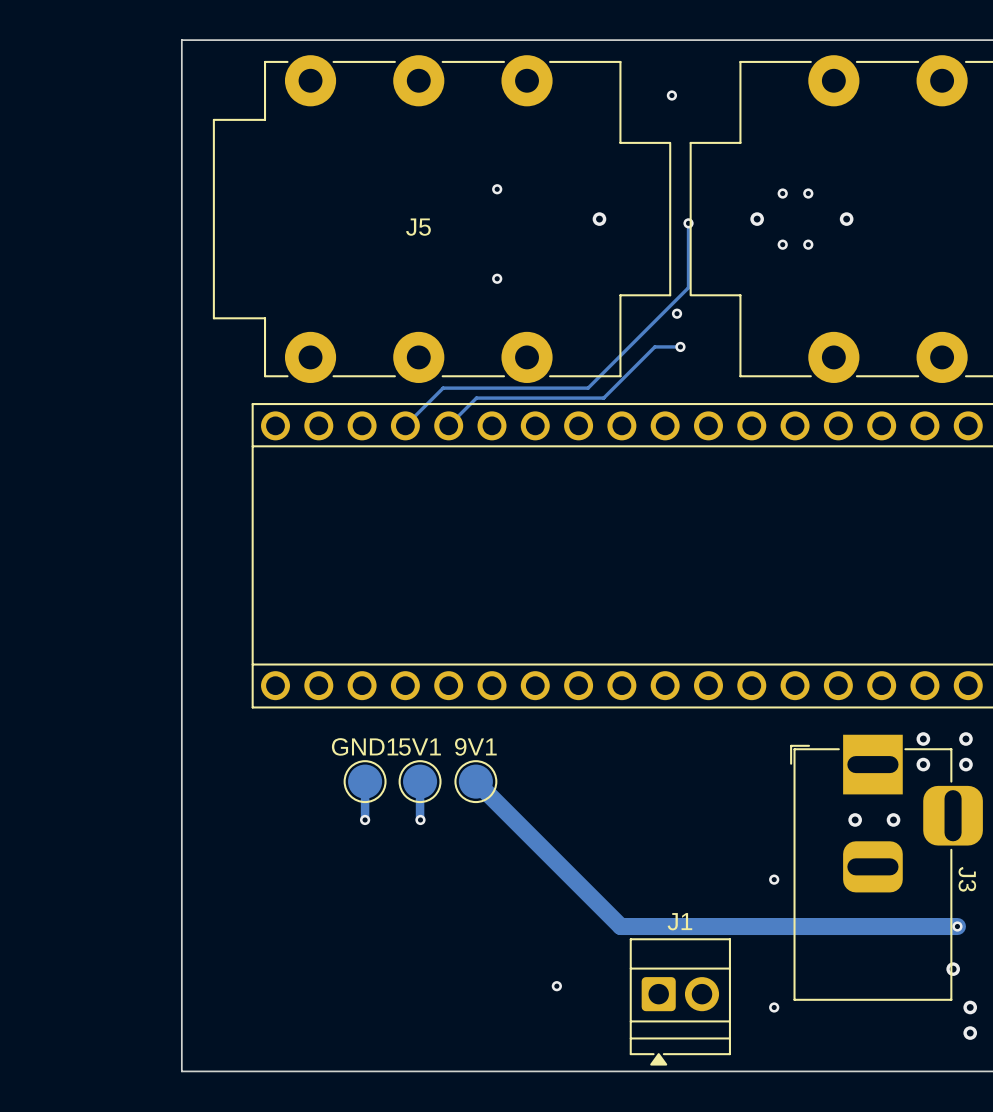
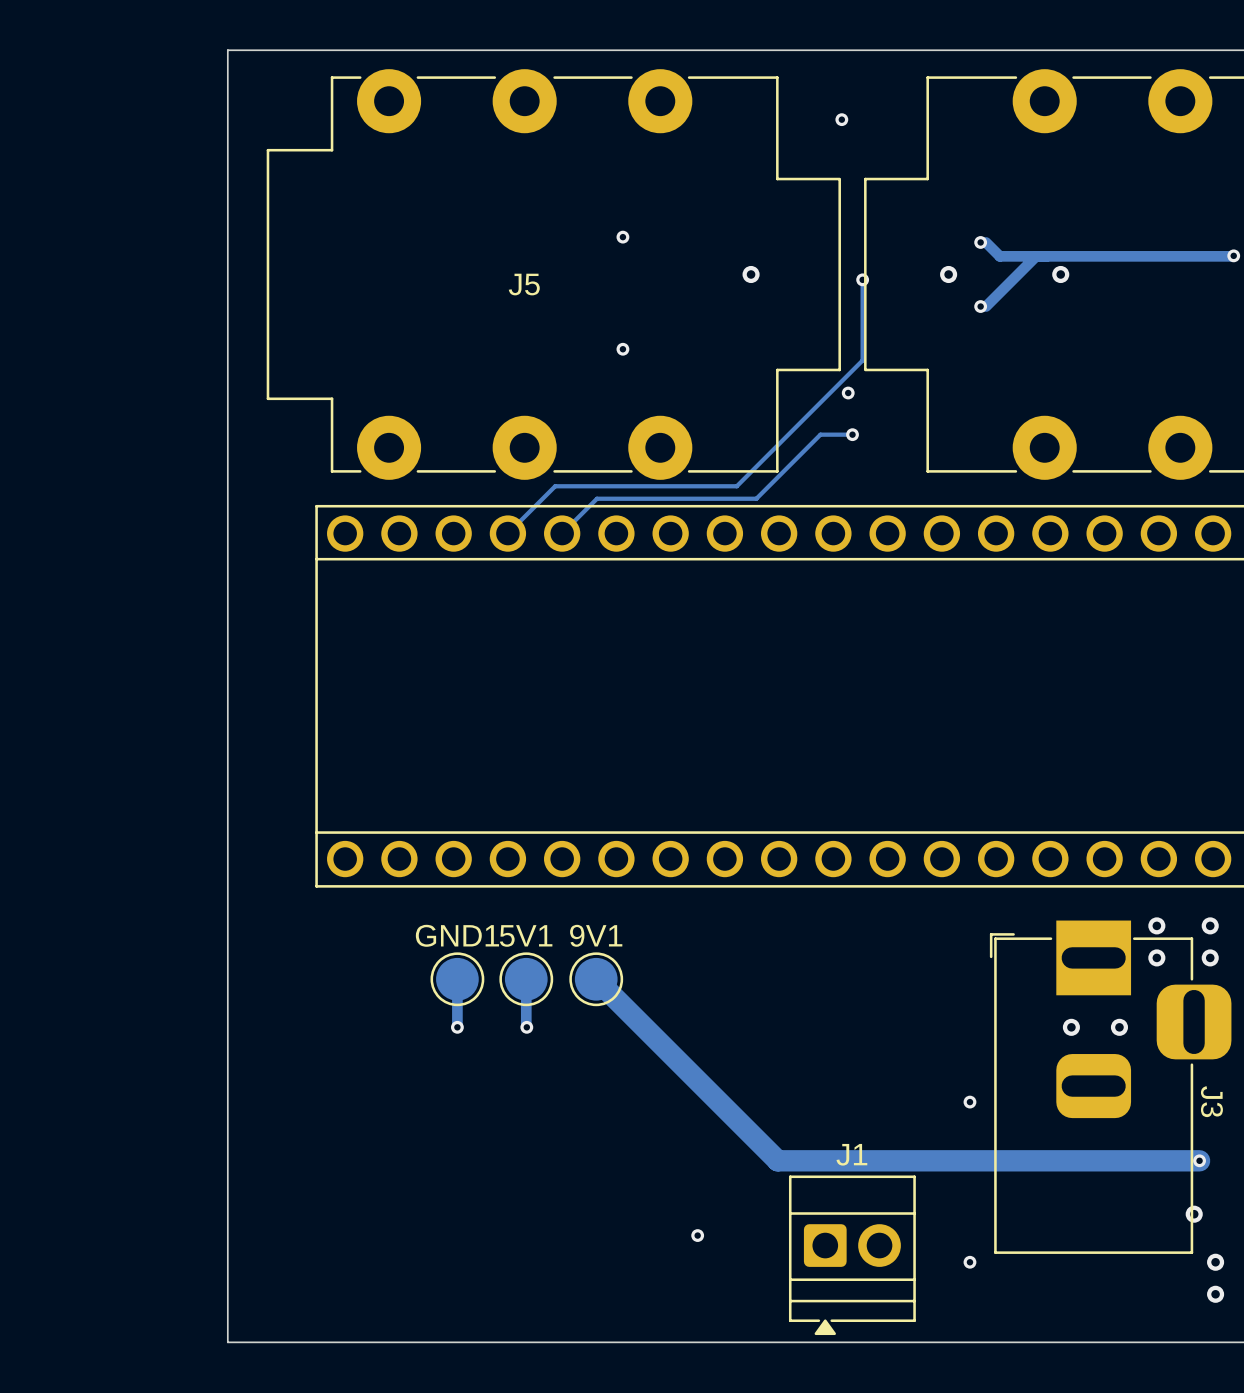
track: none -> (985, 242) (999, 256) (1233, 255)
via: (808, 193) -> none
track: none -> (1036, 256) (985, 306)
via: none -> (1233, 255)
via: (808, 244) -> none

